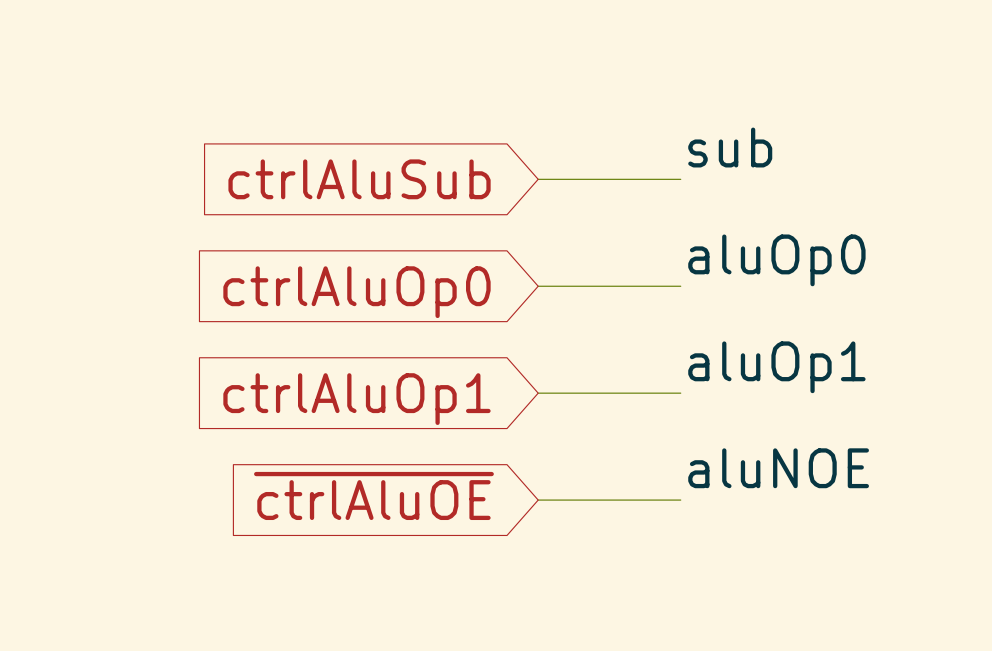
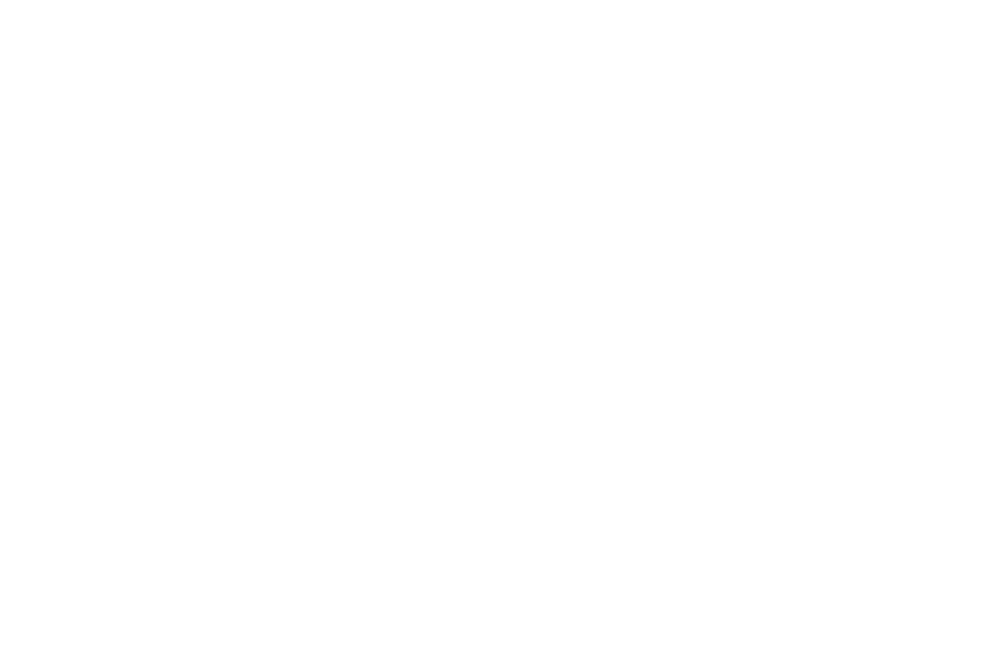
label: sub (730, 147) -> none
global label: ctrlAluSub (359, 179) -> none
wire: (538, 179) (680, 179) -> none
label: aluOp0 (776, 260) -> none
wire: (538, 286) (680, 286) -> none
global label: ctrlAluOp0 (356, 292) -> none
label: aluOp1 (776, 367) -> none
wire: (538, 393) (680, 393) -> none
global label: ctrlAluOp1 (356, 399) -> none
label: aluNOE (778, 468) -> none
global label: ~{ctrlAluOE} (373, 495) -> none
wire: (538, 500) (680, 500) -> none

